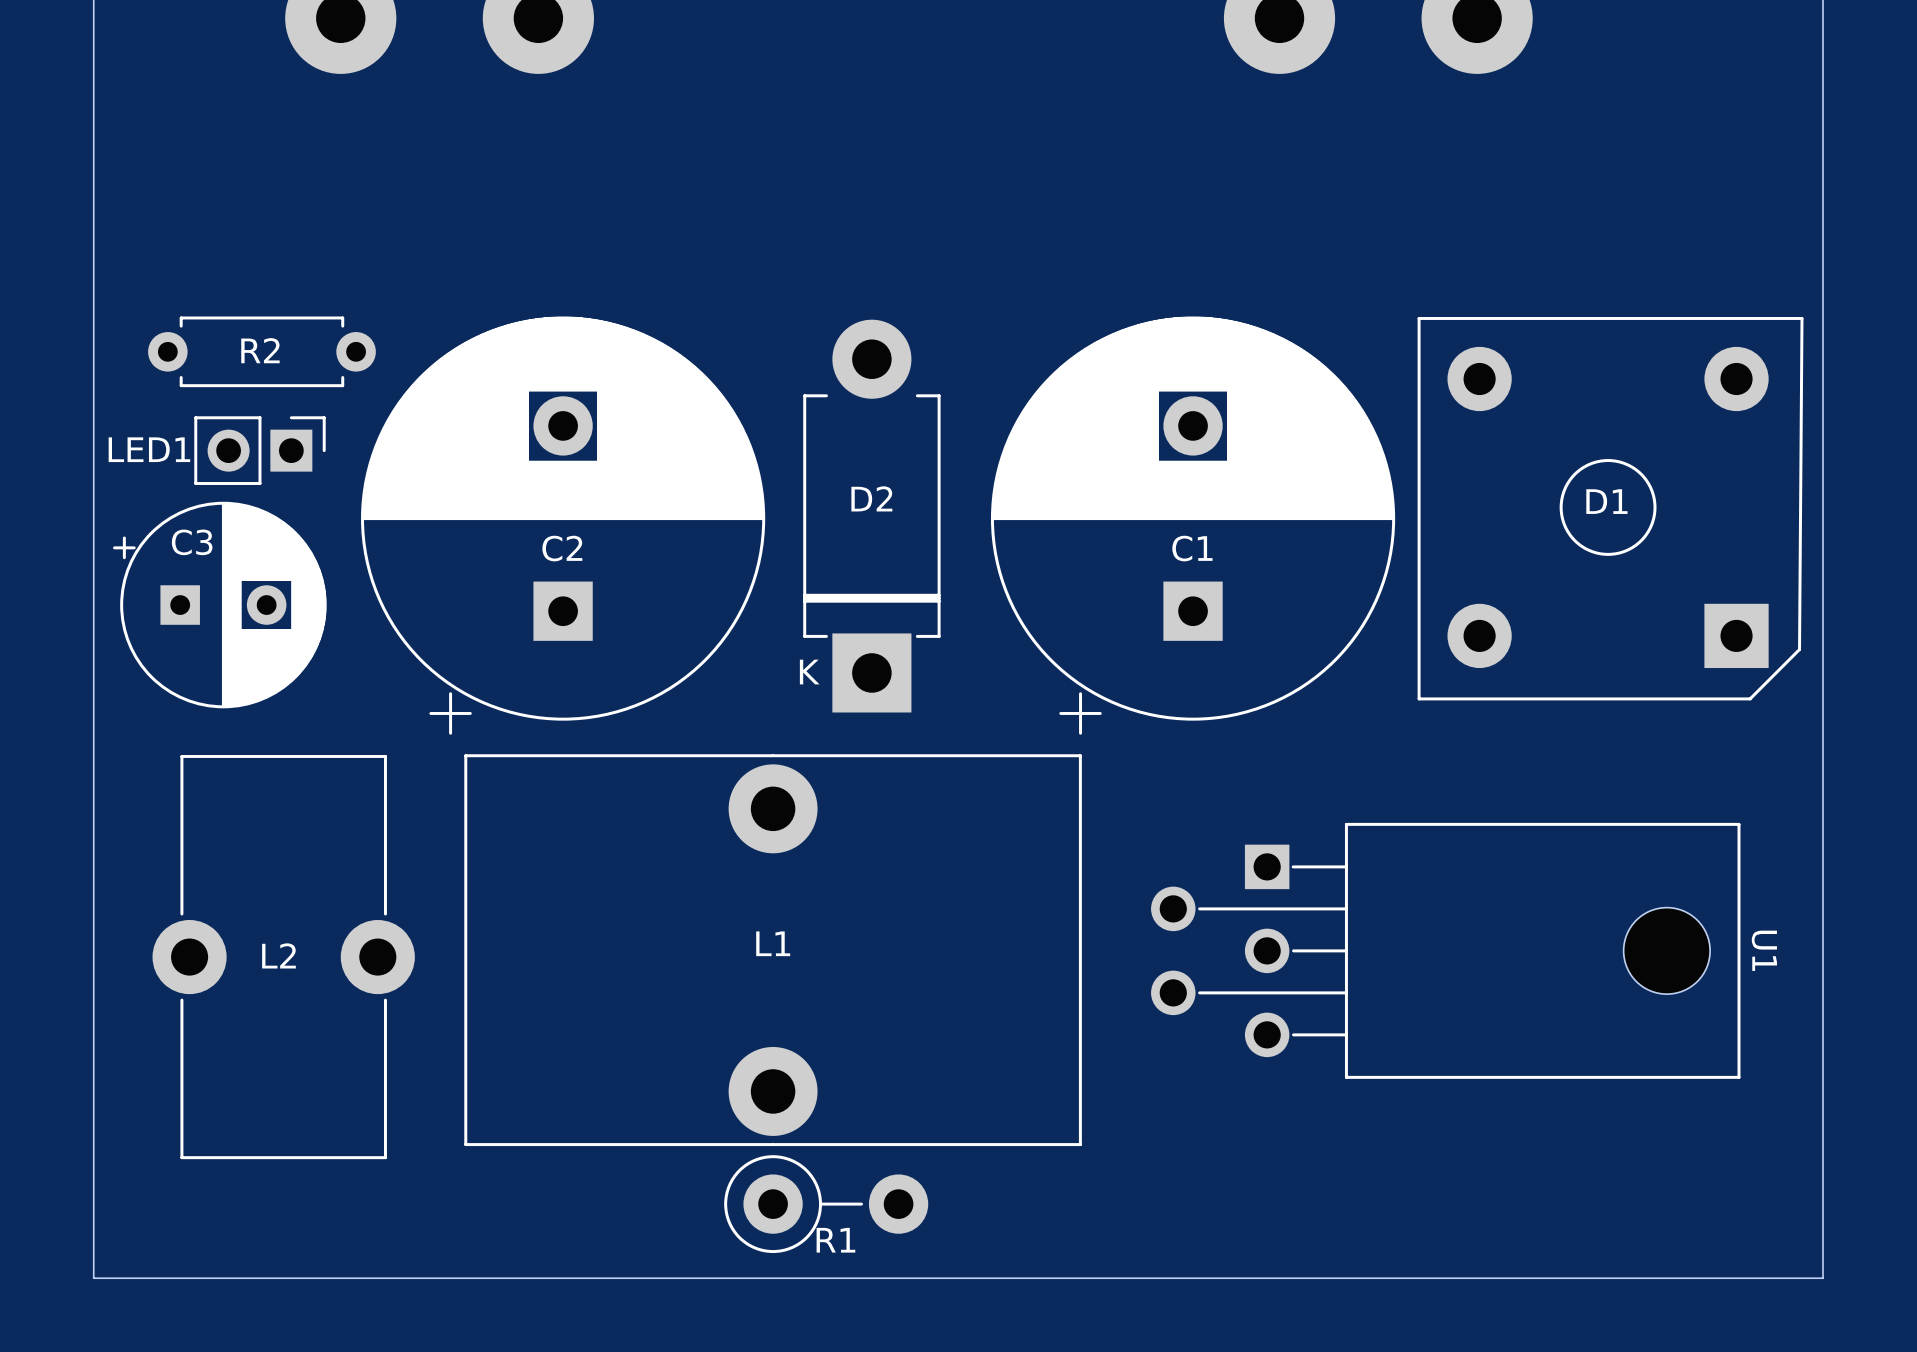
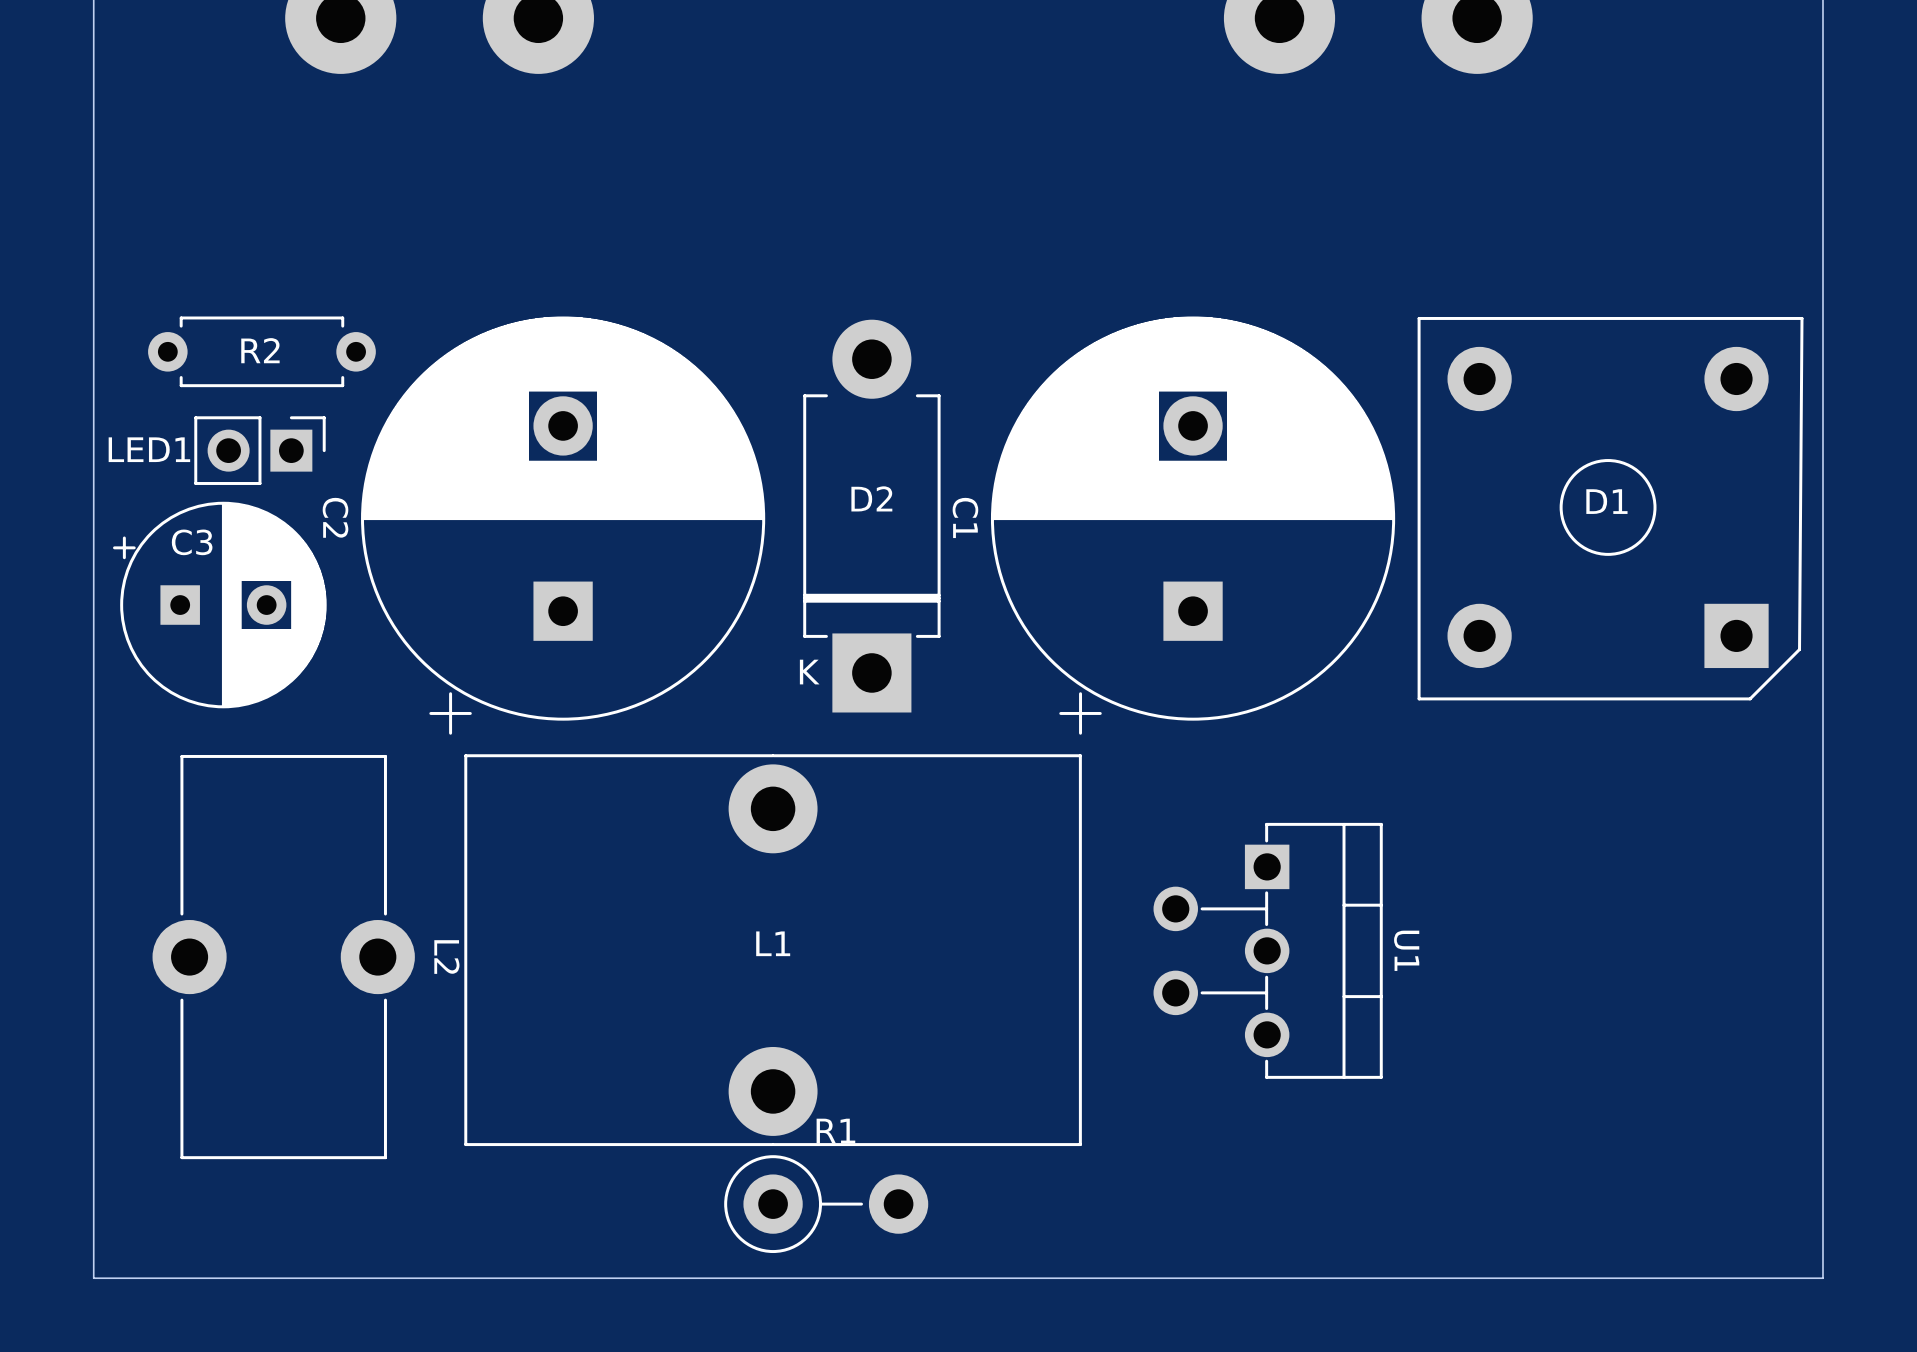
C2 name rotation: 0° (562, 548) -> 90° clockwise (335, 517)
C2 name position: C2 (562, 548) -> C2 (335, 517)
C1 name rotation: 0° (1192, 548) -> 90° clockwise (965, 517)
C1 name position: C1 (1192, 548) -> C1 (965, 517)
U1 footprint: [1151, 822, 1741, 1079] -> [1153, 822, 1383, 1079]
U1 name position: U1 (1764, 950) -> U1 (1406, 950)
L2 name rotation: 0° (278, 955) -> 90° clockwise (446, 957)
L2 name position: L2 (278, 955) -> L2 (446, 957)
R1 name position: R1 (835, 1240) -> R1 (835, 1131)

